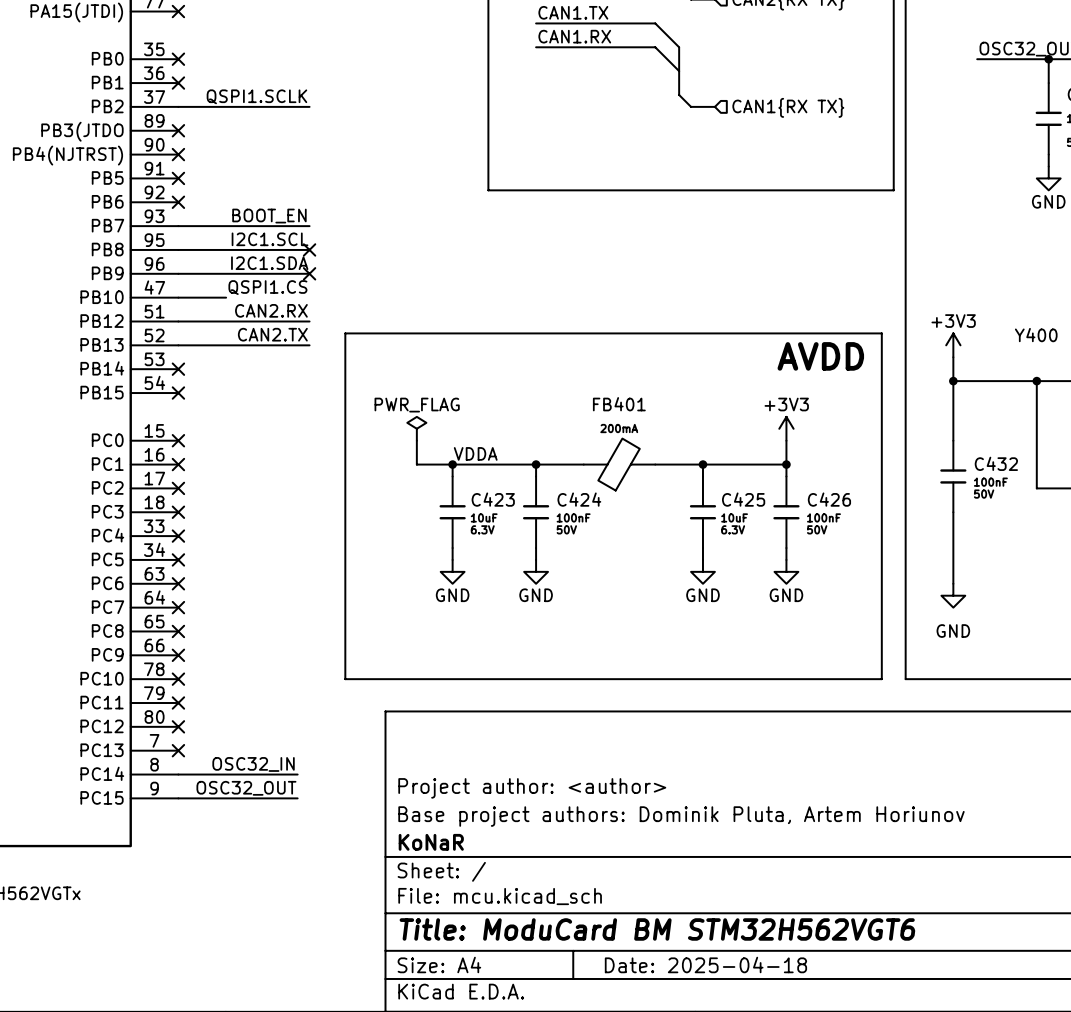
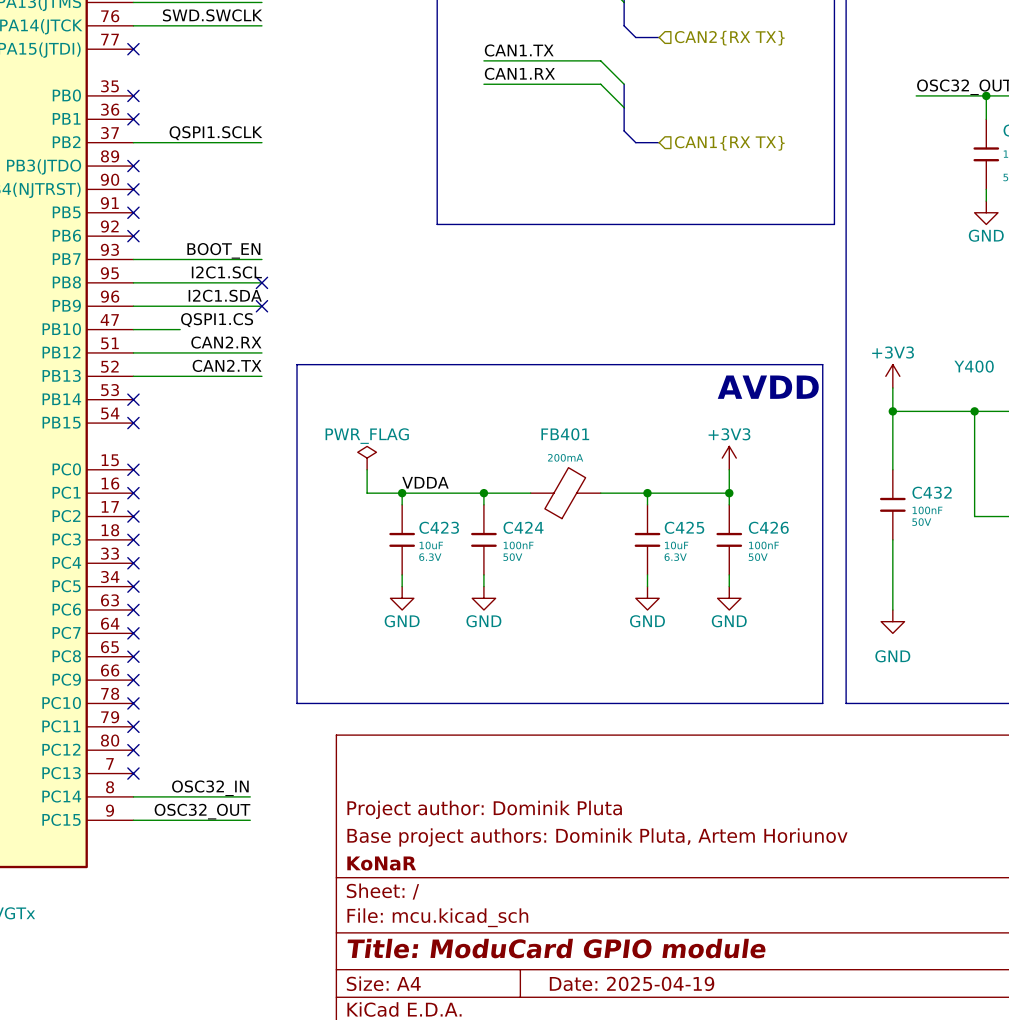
title block: Project author: <author> (532, 788) -> Project author: Dominik Pluta (484, 809)
title block: Title: ModuCard BM STM32H562VGT6 (657, 929) -> Title: ModuCard GPIO module (556, 948)
title block: Date: 2025-04-18 (705, 964) -> Date: 2025-04-19 (632, 983)

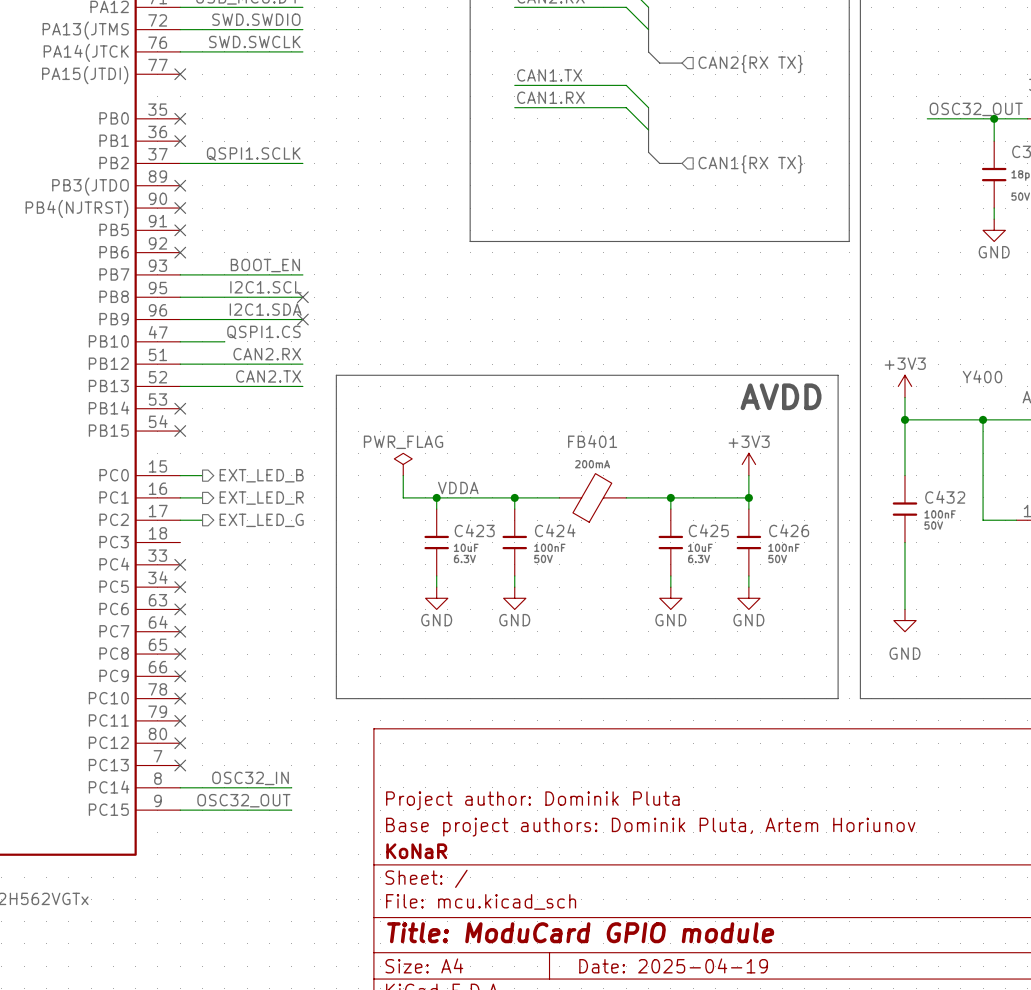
wire: none -> (180, 475) (202, 475)
no-connect mark: (133, 469) -> none
hierarchical label: none -> EXT_LED_B (261, 475)
wire: none -> (180, 497) (202, 497)
no-connect mark: (133, 493) -> none
hierarchical label: none -> EXT_LED_R (261, 498)
wire: none -> (180, 520) (202, 520)
no-connect mark: (133, 516) -> none
hierarchical label: none -> EXT_LED_G (261, 520)
no-connect mark: (133, 539) -> none

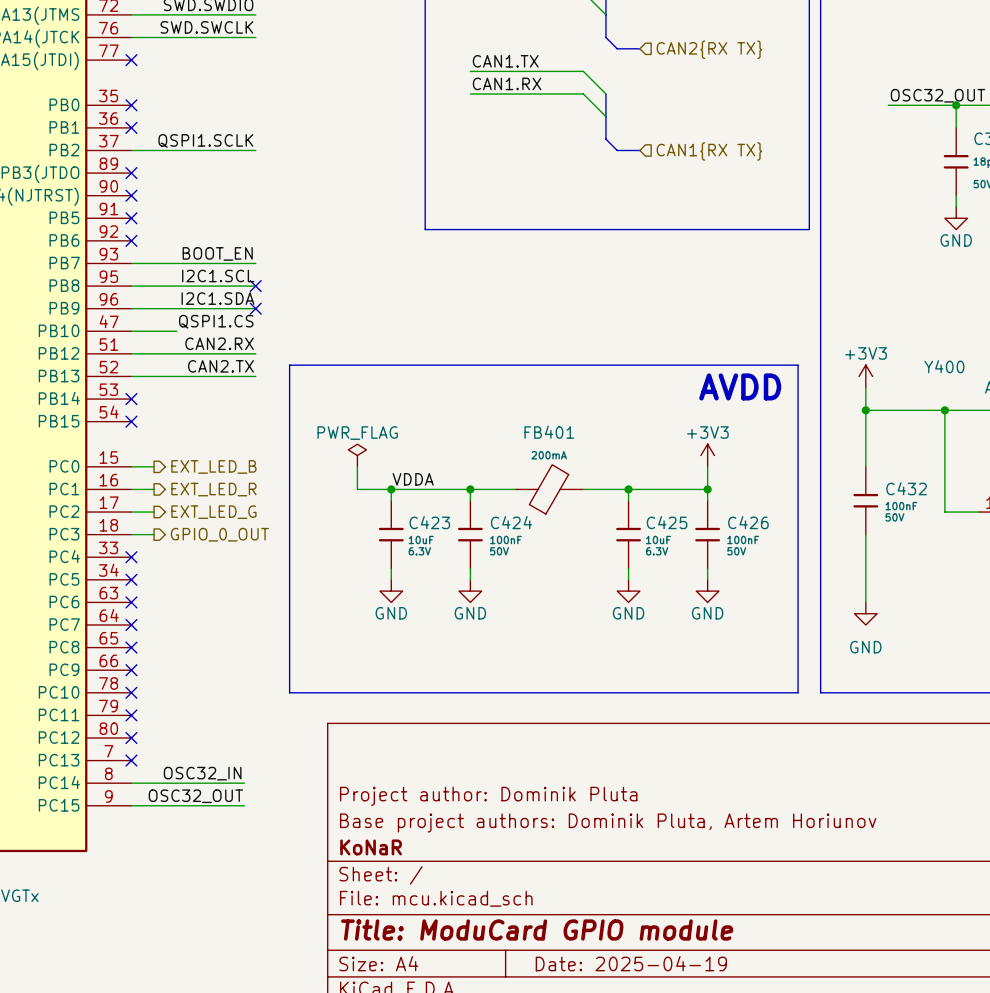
wire: none -> (131, 534) (154, 534)
hierarchical label: none -> GPIO_0_OUT (219, 534)

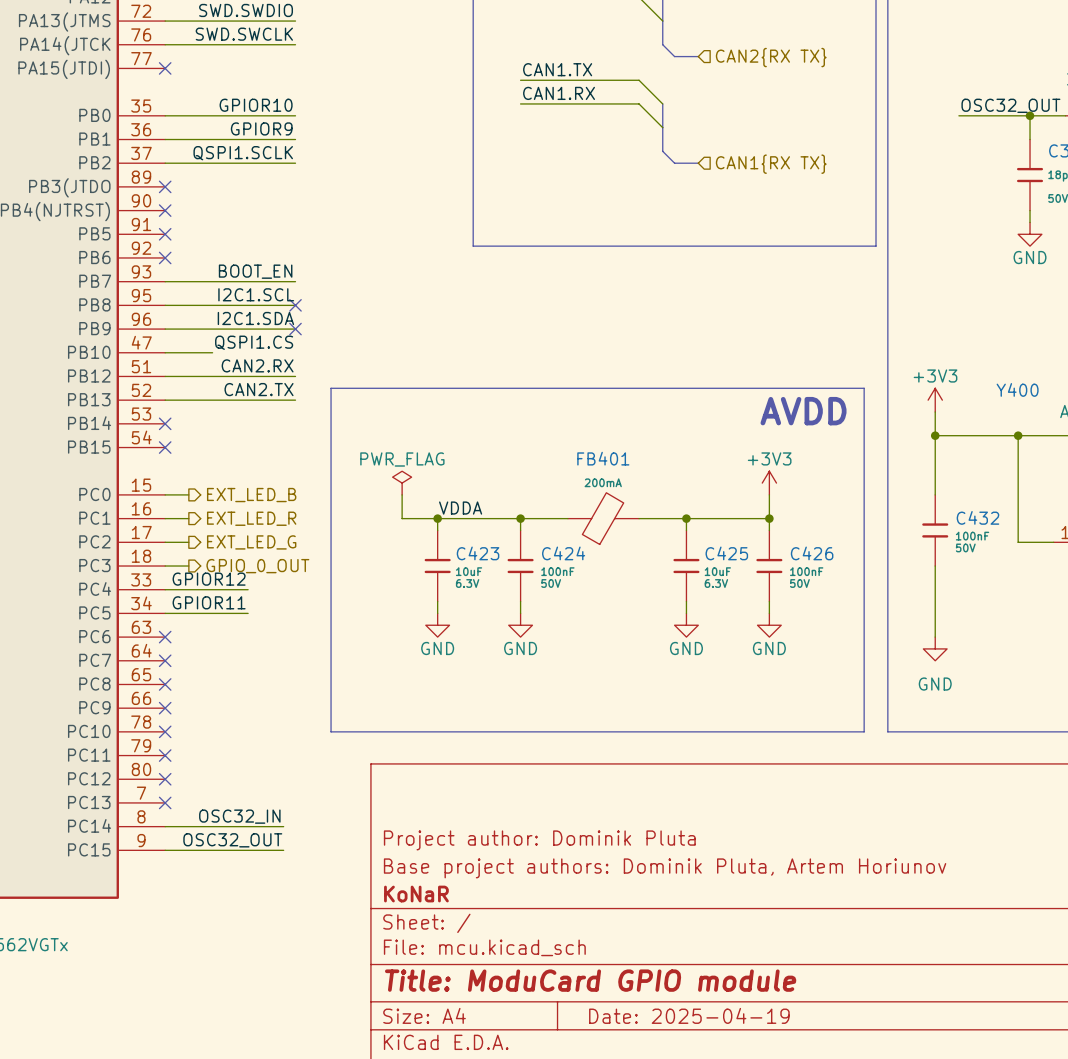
label: none -> GPIOR10 (256, 105)
wire: none -> (165, 115) (295, 115)
no-connect mark: (131, 105) -> none
label: none -> GPIOR9 (261, 128)
wire: none -> (165, 139) (295, 139)
no-connect mark: (131, 127) -> none
label: none -> GPIOR12 (209, 579)
wire: none -> (165, 589) (248, 589)
no-connect mark: (131, 557) -> none
label: none -> GPIOR11 (209, 602)
wire: none -> (165, 613) (248, 613)
no-connect mark: (131, 579) -> none

